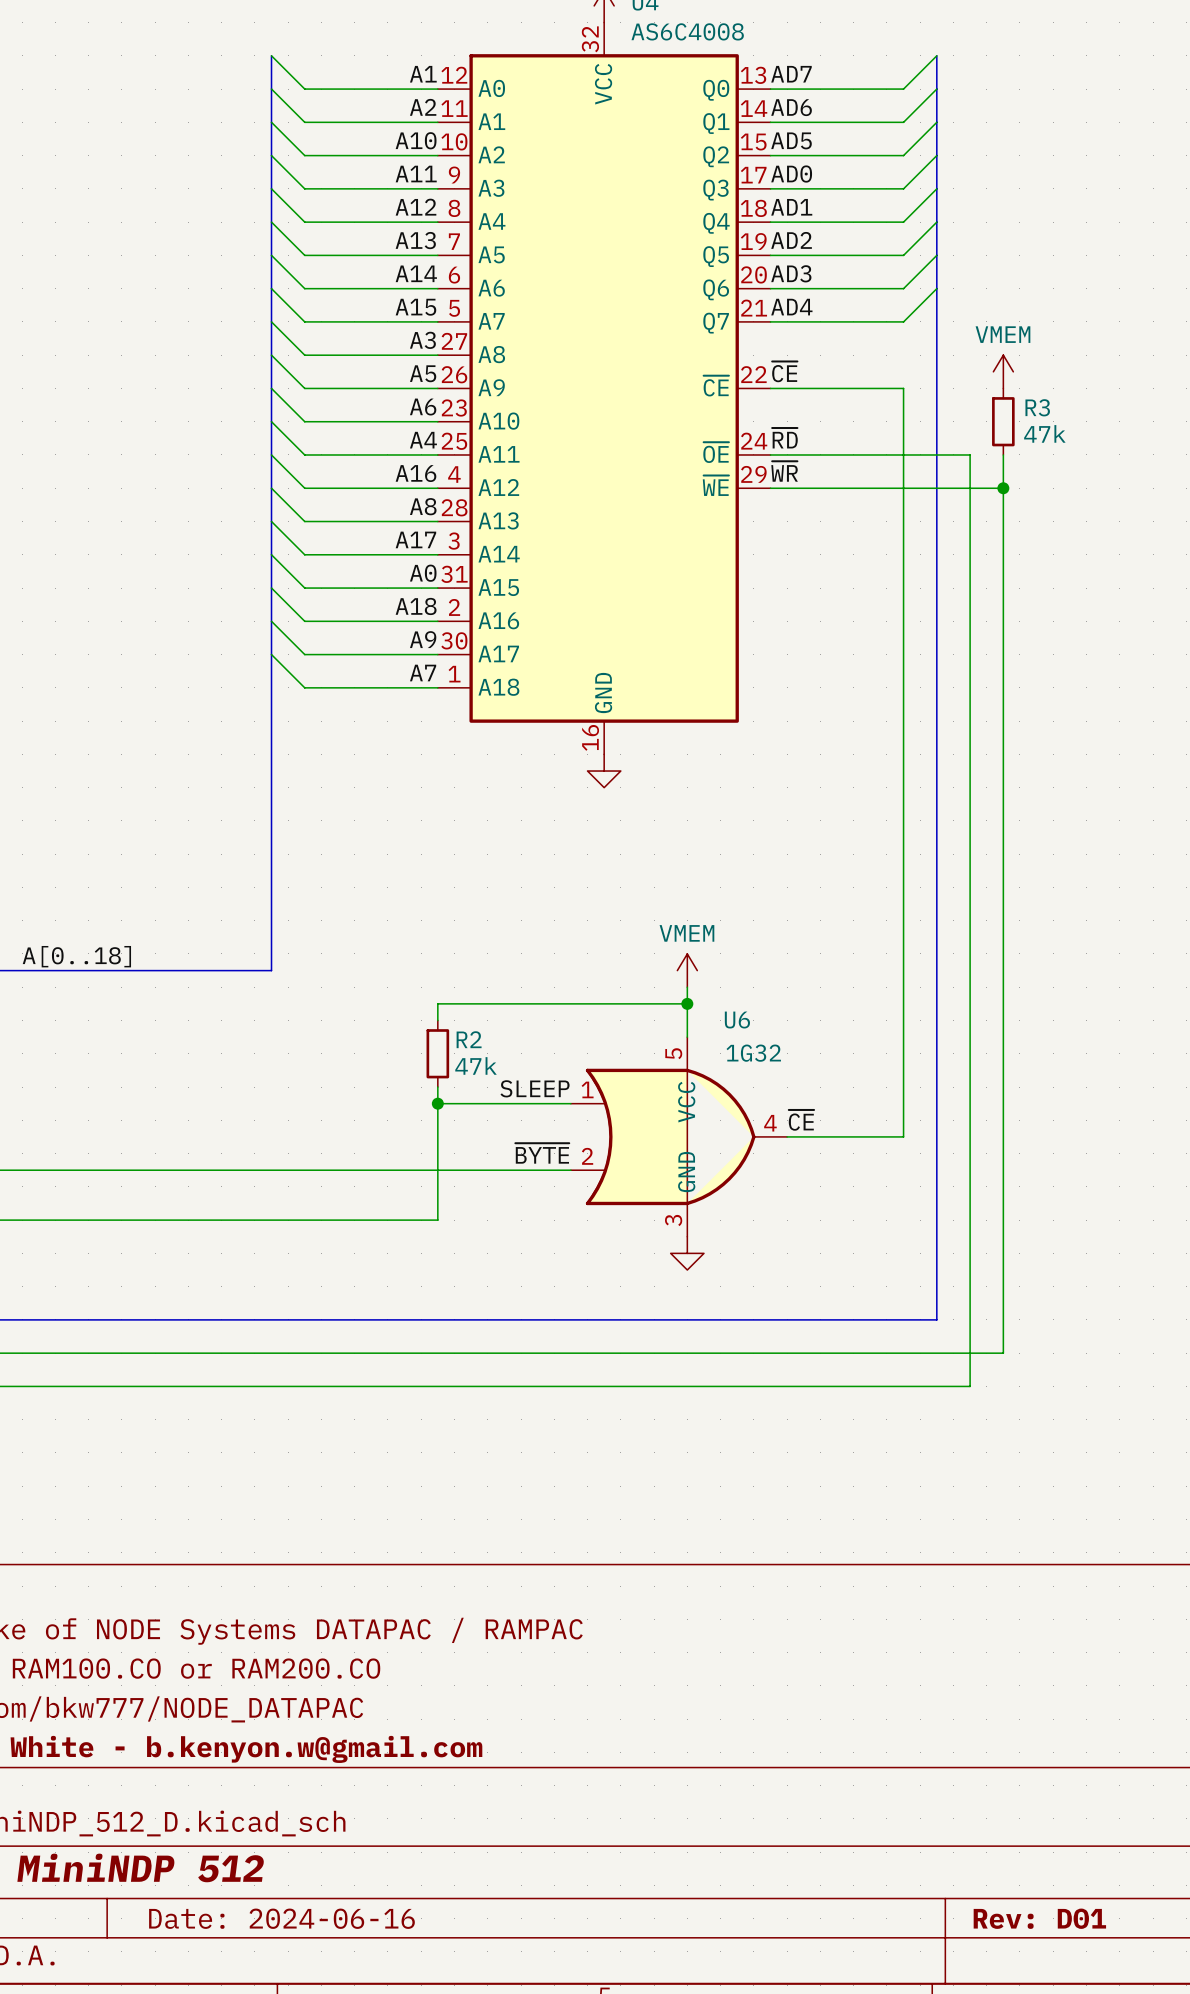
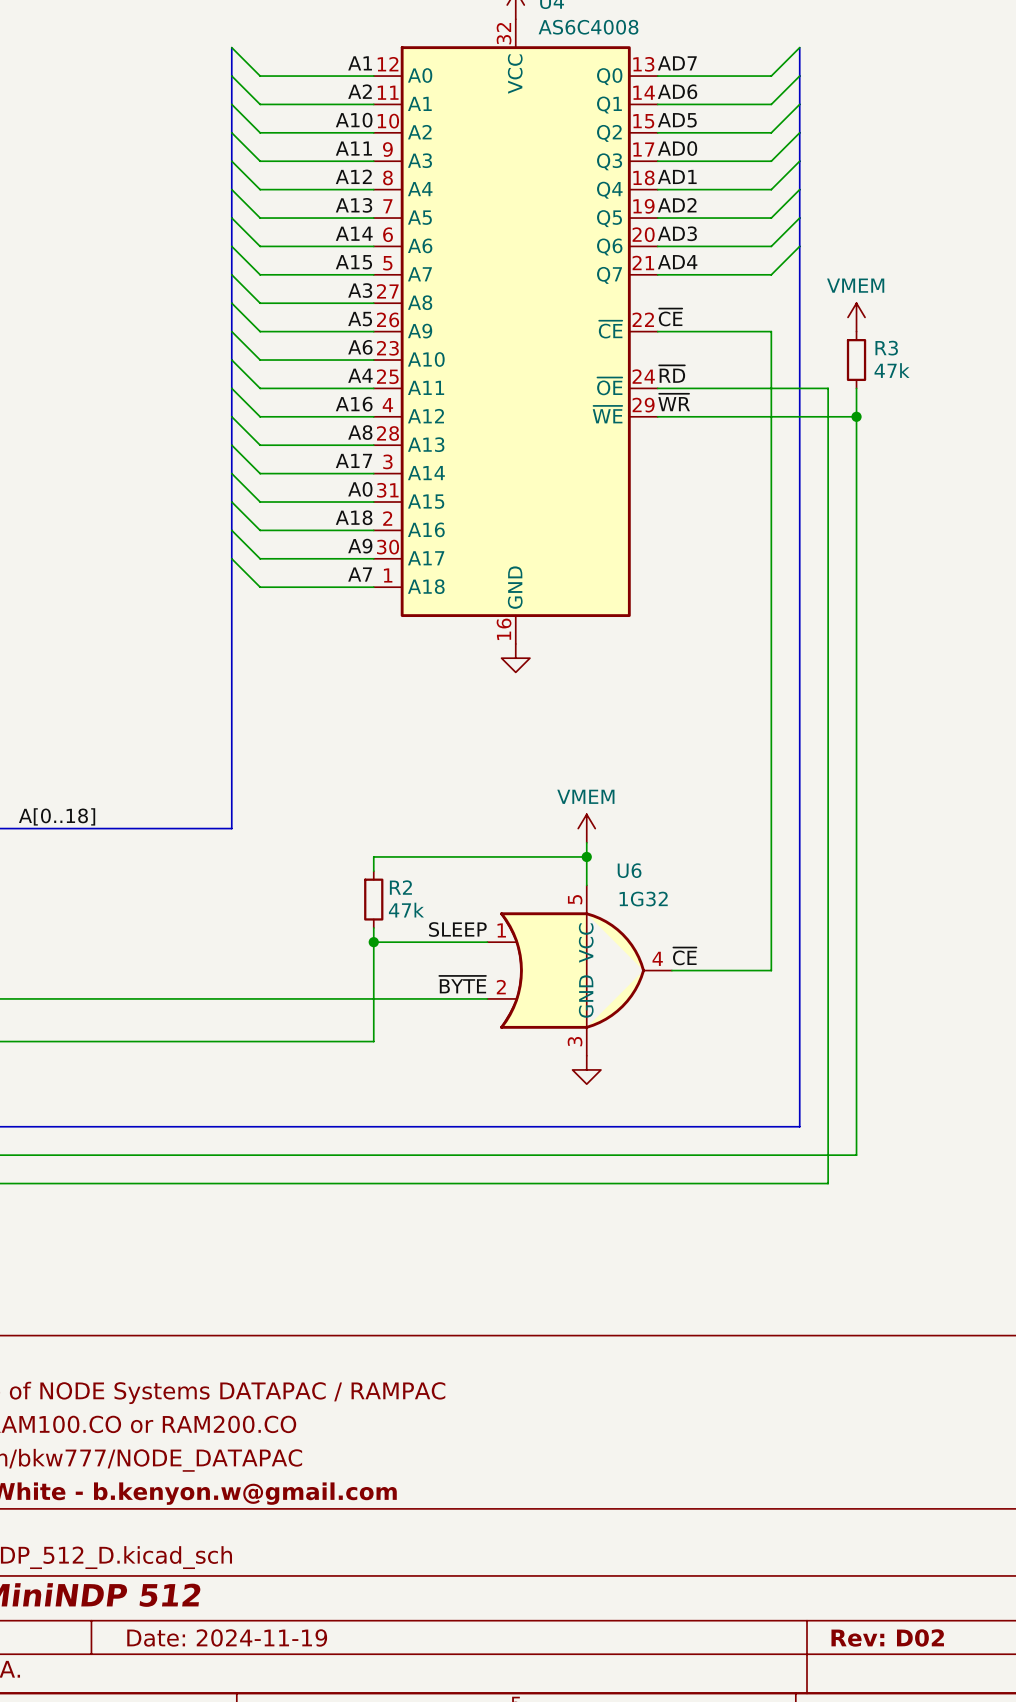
title block: Date: 2024-06-16 (281, 1918) -> Date: 2024-11-19 (227, 1637)
title block: Rev: D01 (1039, 1918) -> Rev: D02 (887, 1637)

